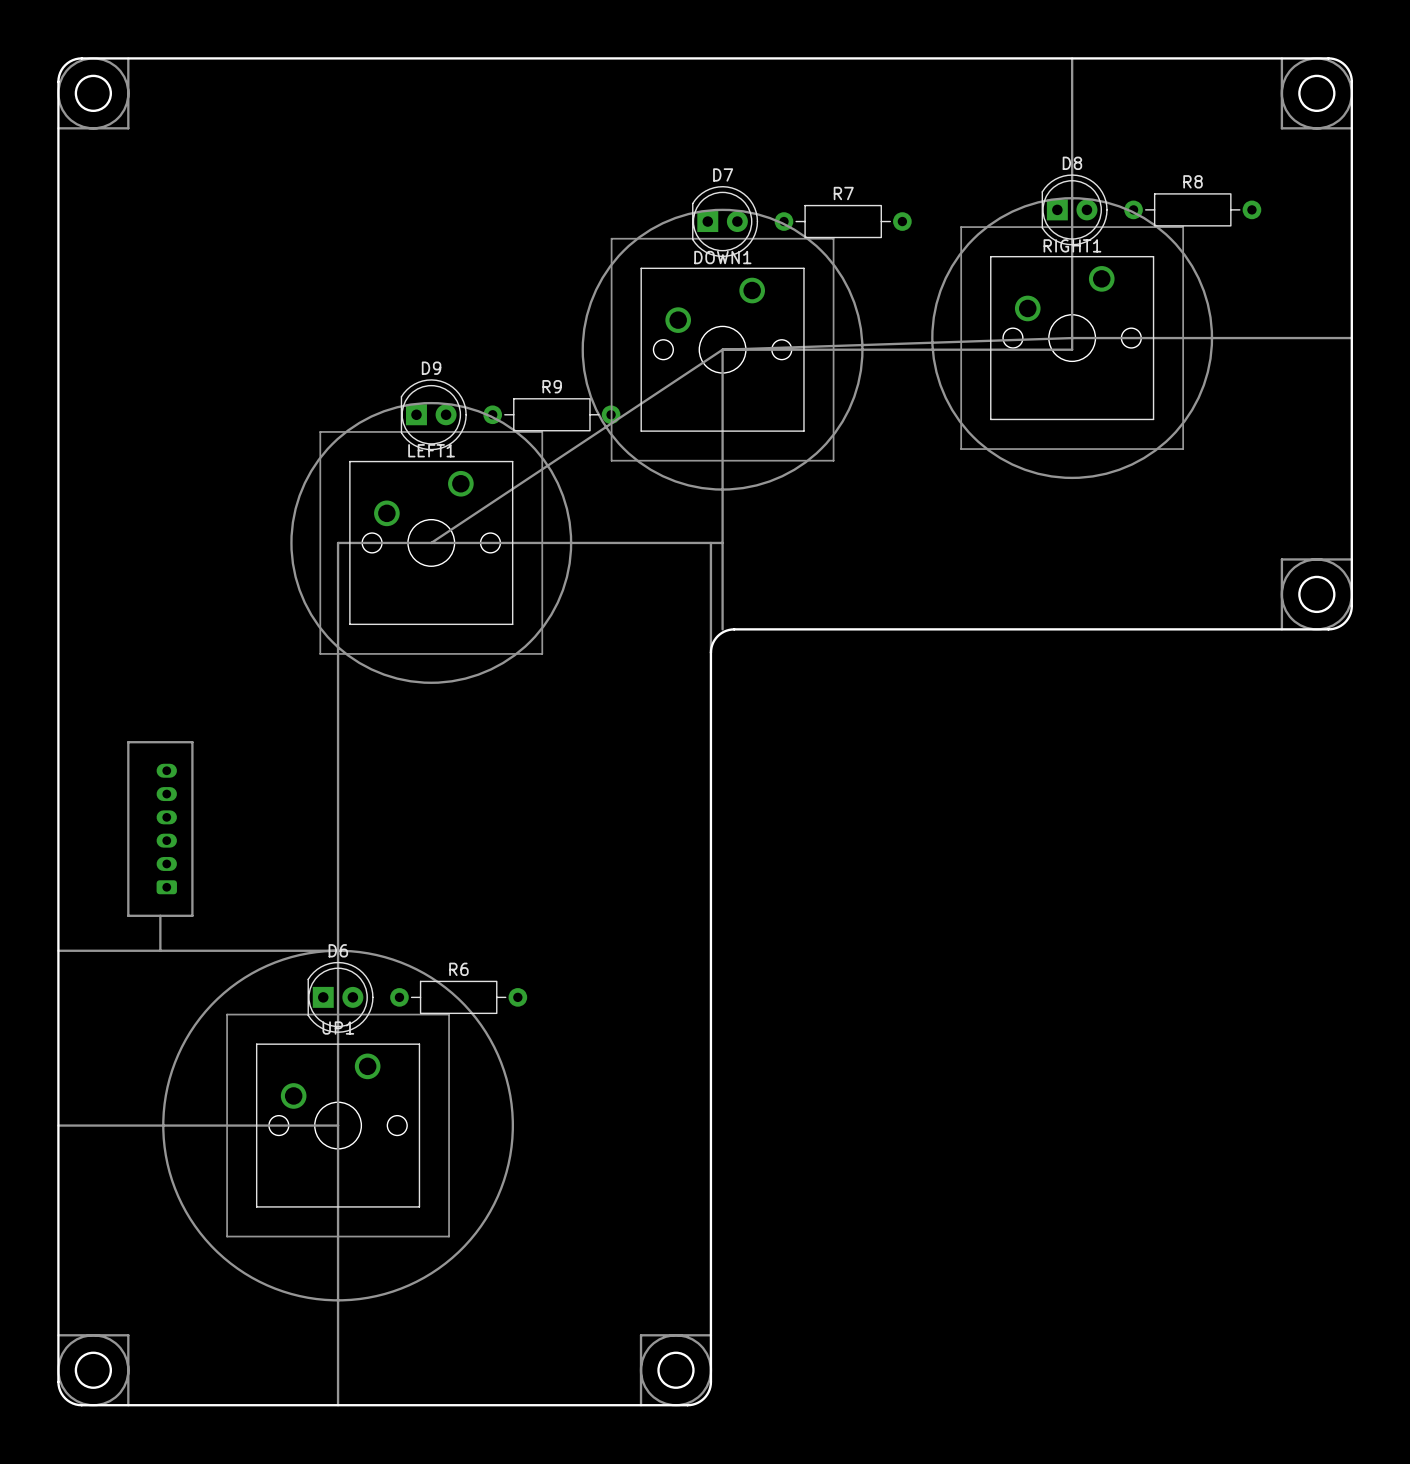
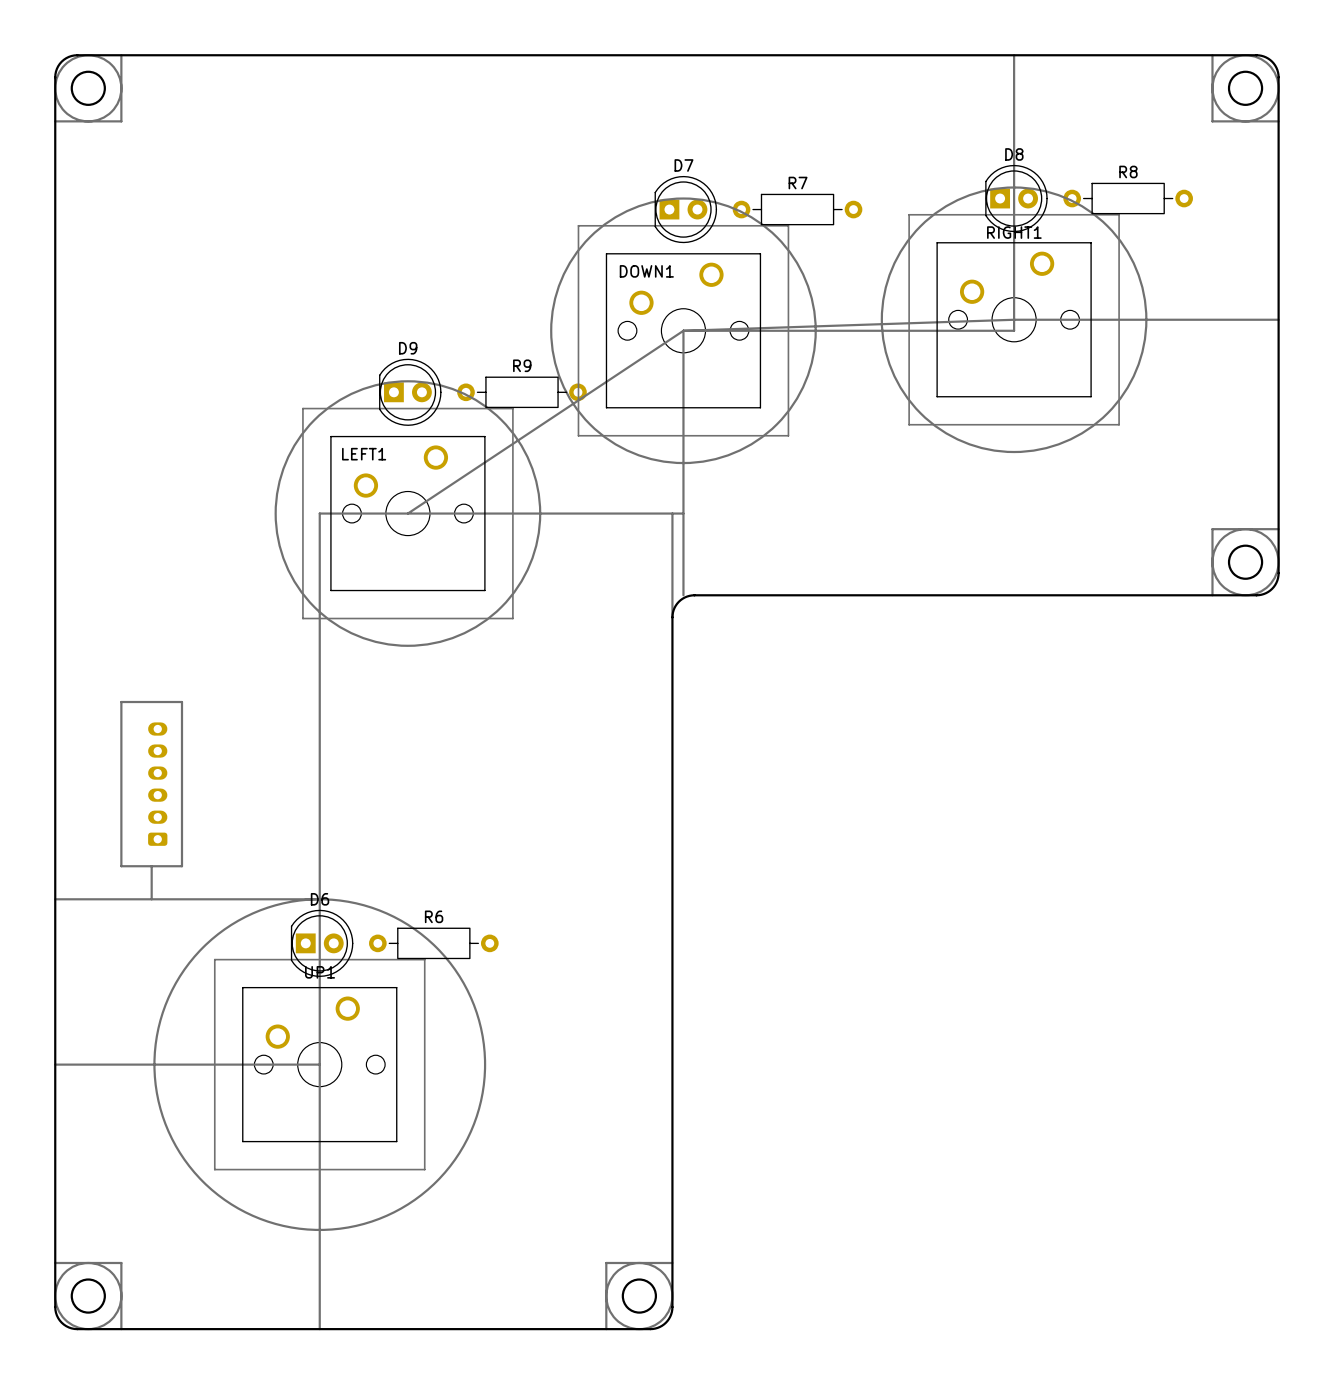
DOWN1 name position: DOWN1 (722, 257) -> DOWN1 (646, 271)
LEFT1 name position: LEFT1 (431, 450) -> LEFT1 (364, 454)

